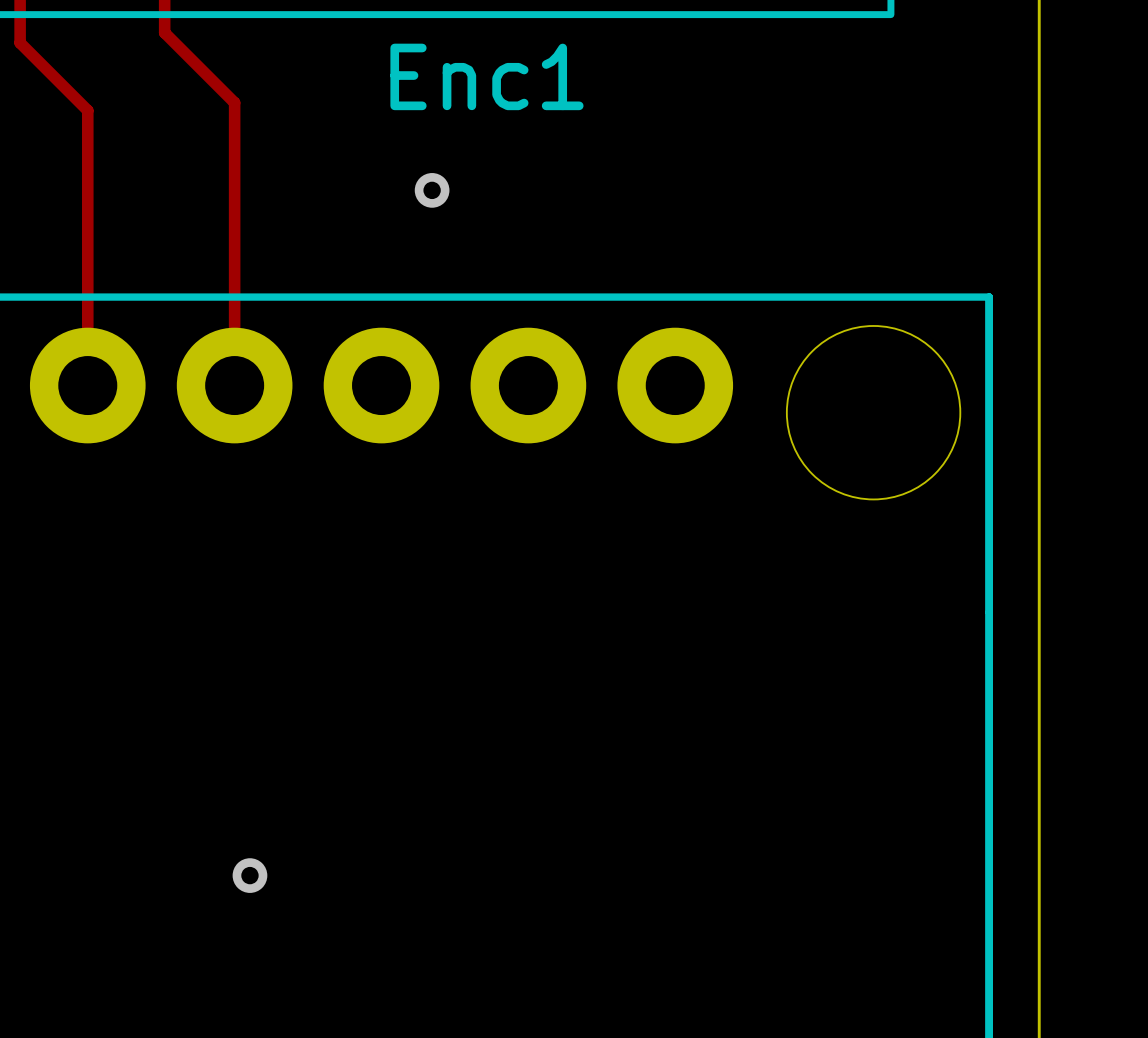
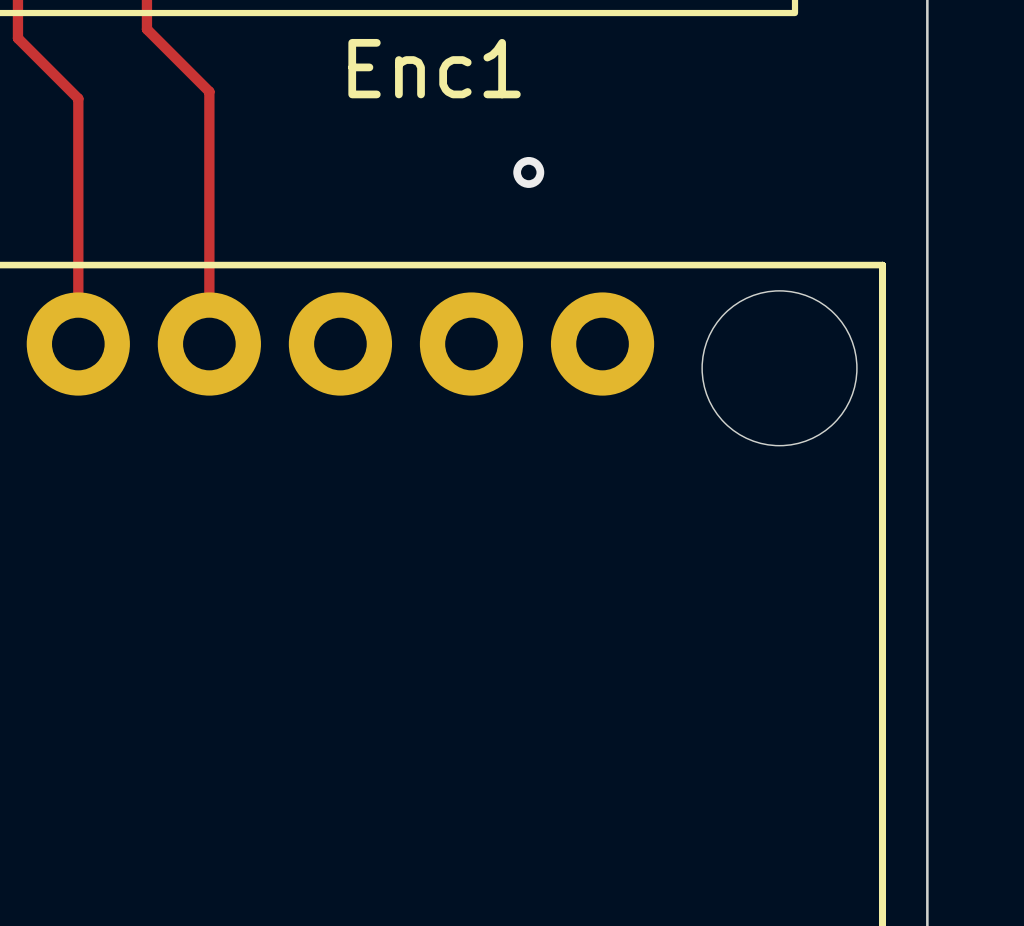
via position: (432, 190) -> (528, 172)
via: (249, 875) -> none

